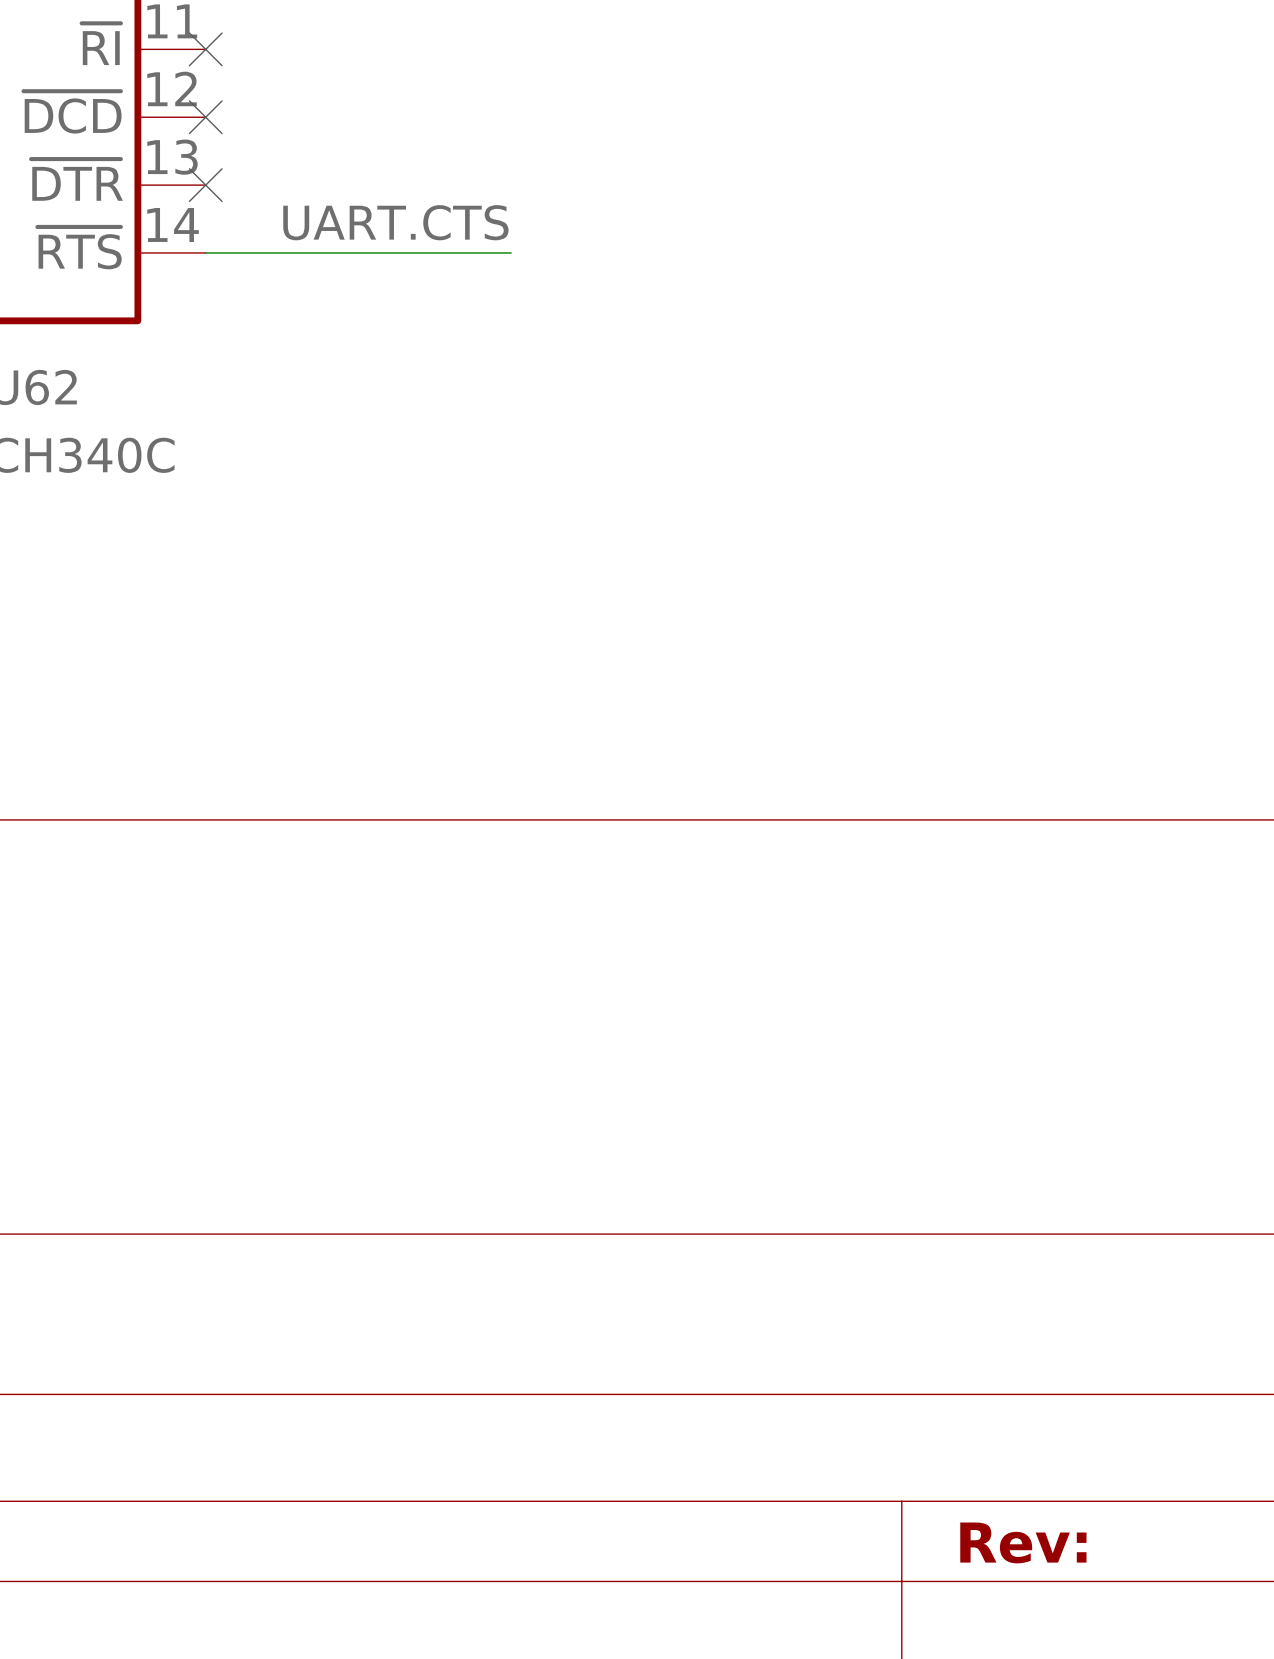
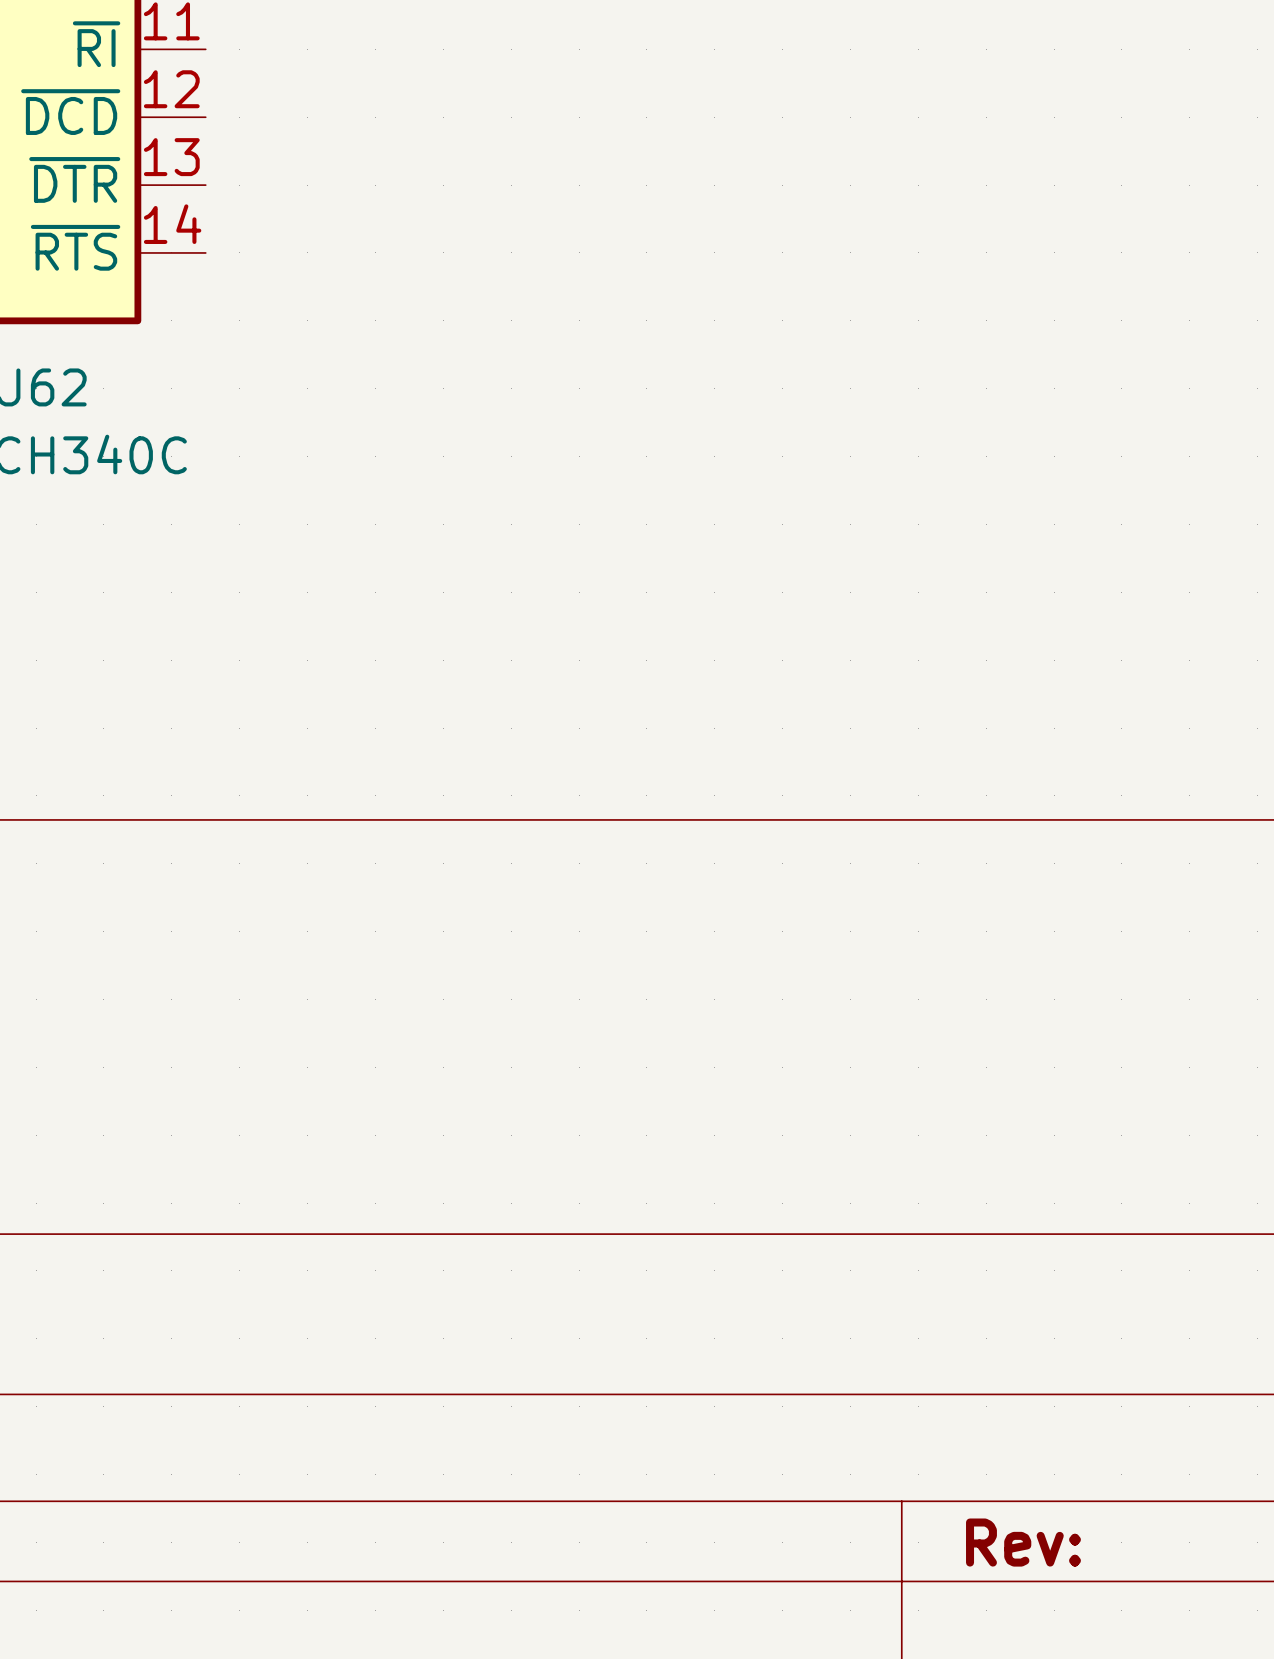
no-connect mark: (205, 49) -> none
no-connect mark: (205, 117) -> none
no-connect mark: (205, 185) -> none
label: UART.CTS (395, 222) -> none
wire: (205, 252) (511, 252) -> none

